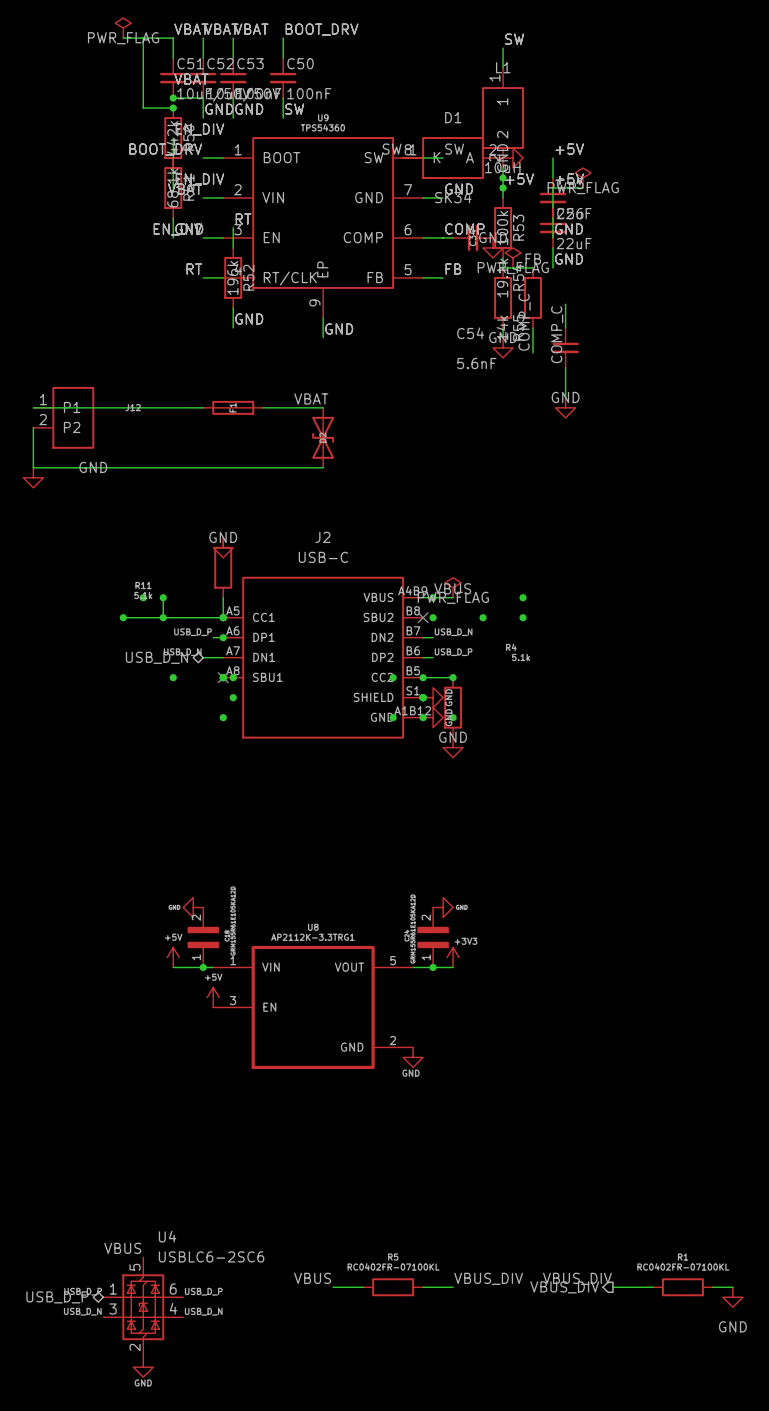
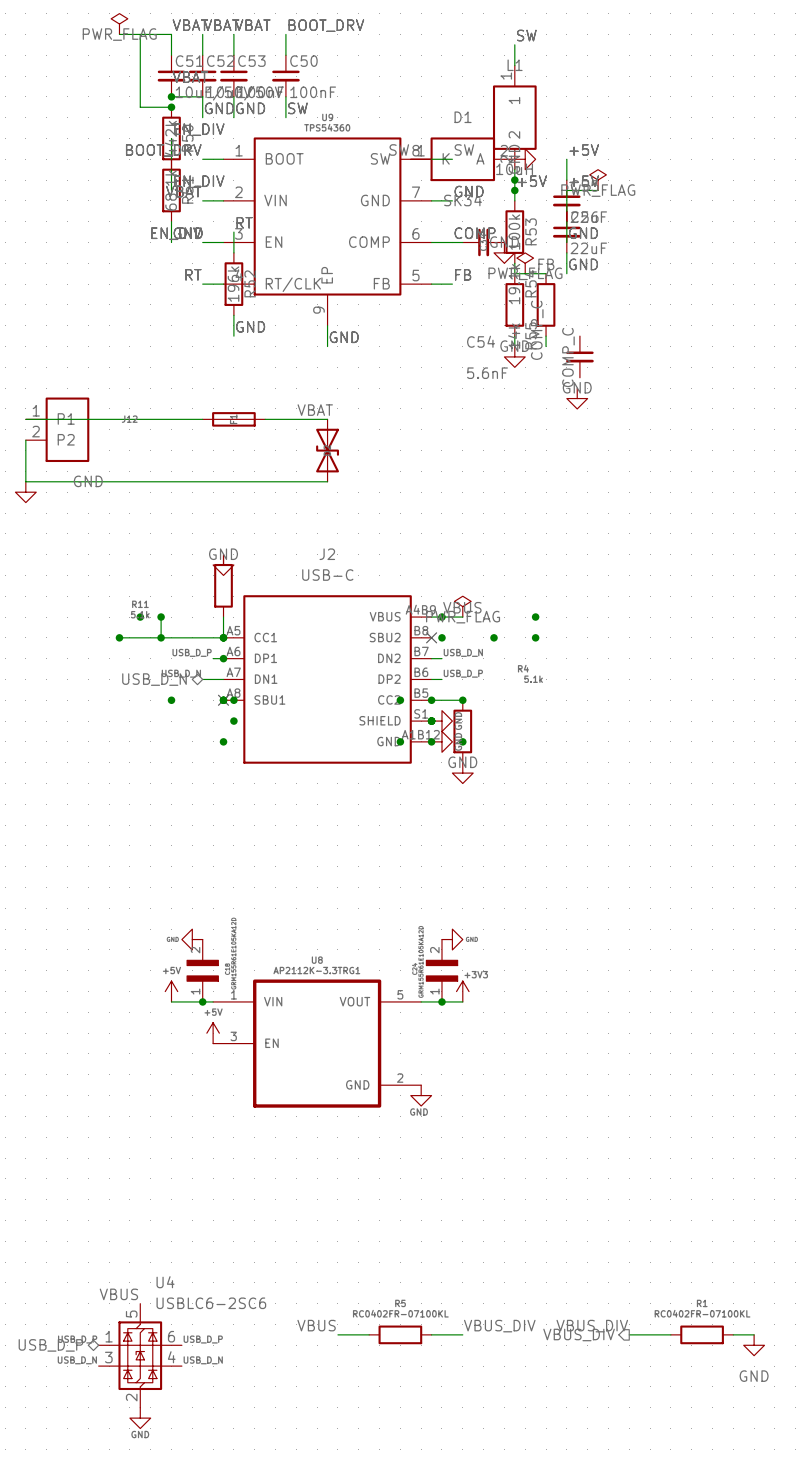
wire: (565, 304) (565, 327) -> none
label position: COMP_C (557, 334) -> COMP_C (568, 357)
wire: (533, 337) (533, 352) -> none
wire: (565, 367) (565, 397) -> none
power symbol position: GND (565, 407) -> GND (577, 398)

